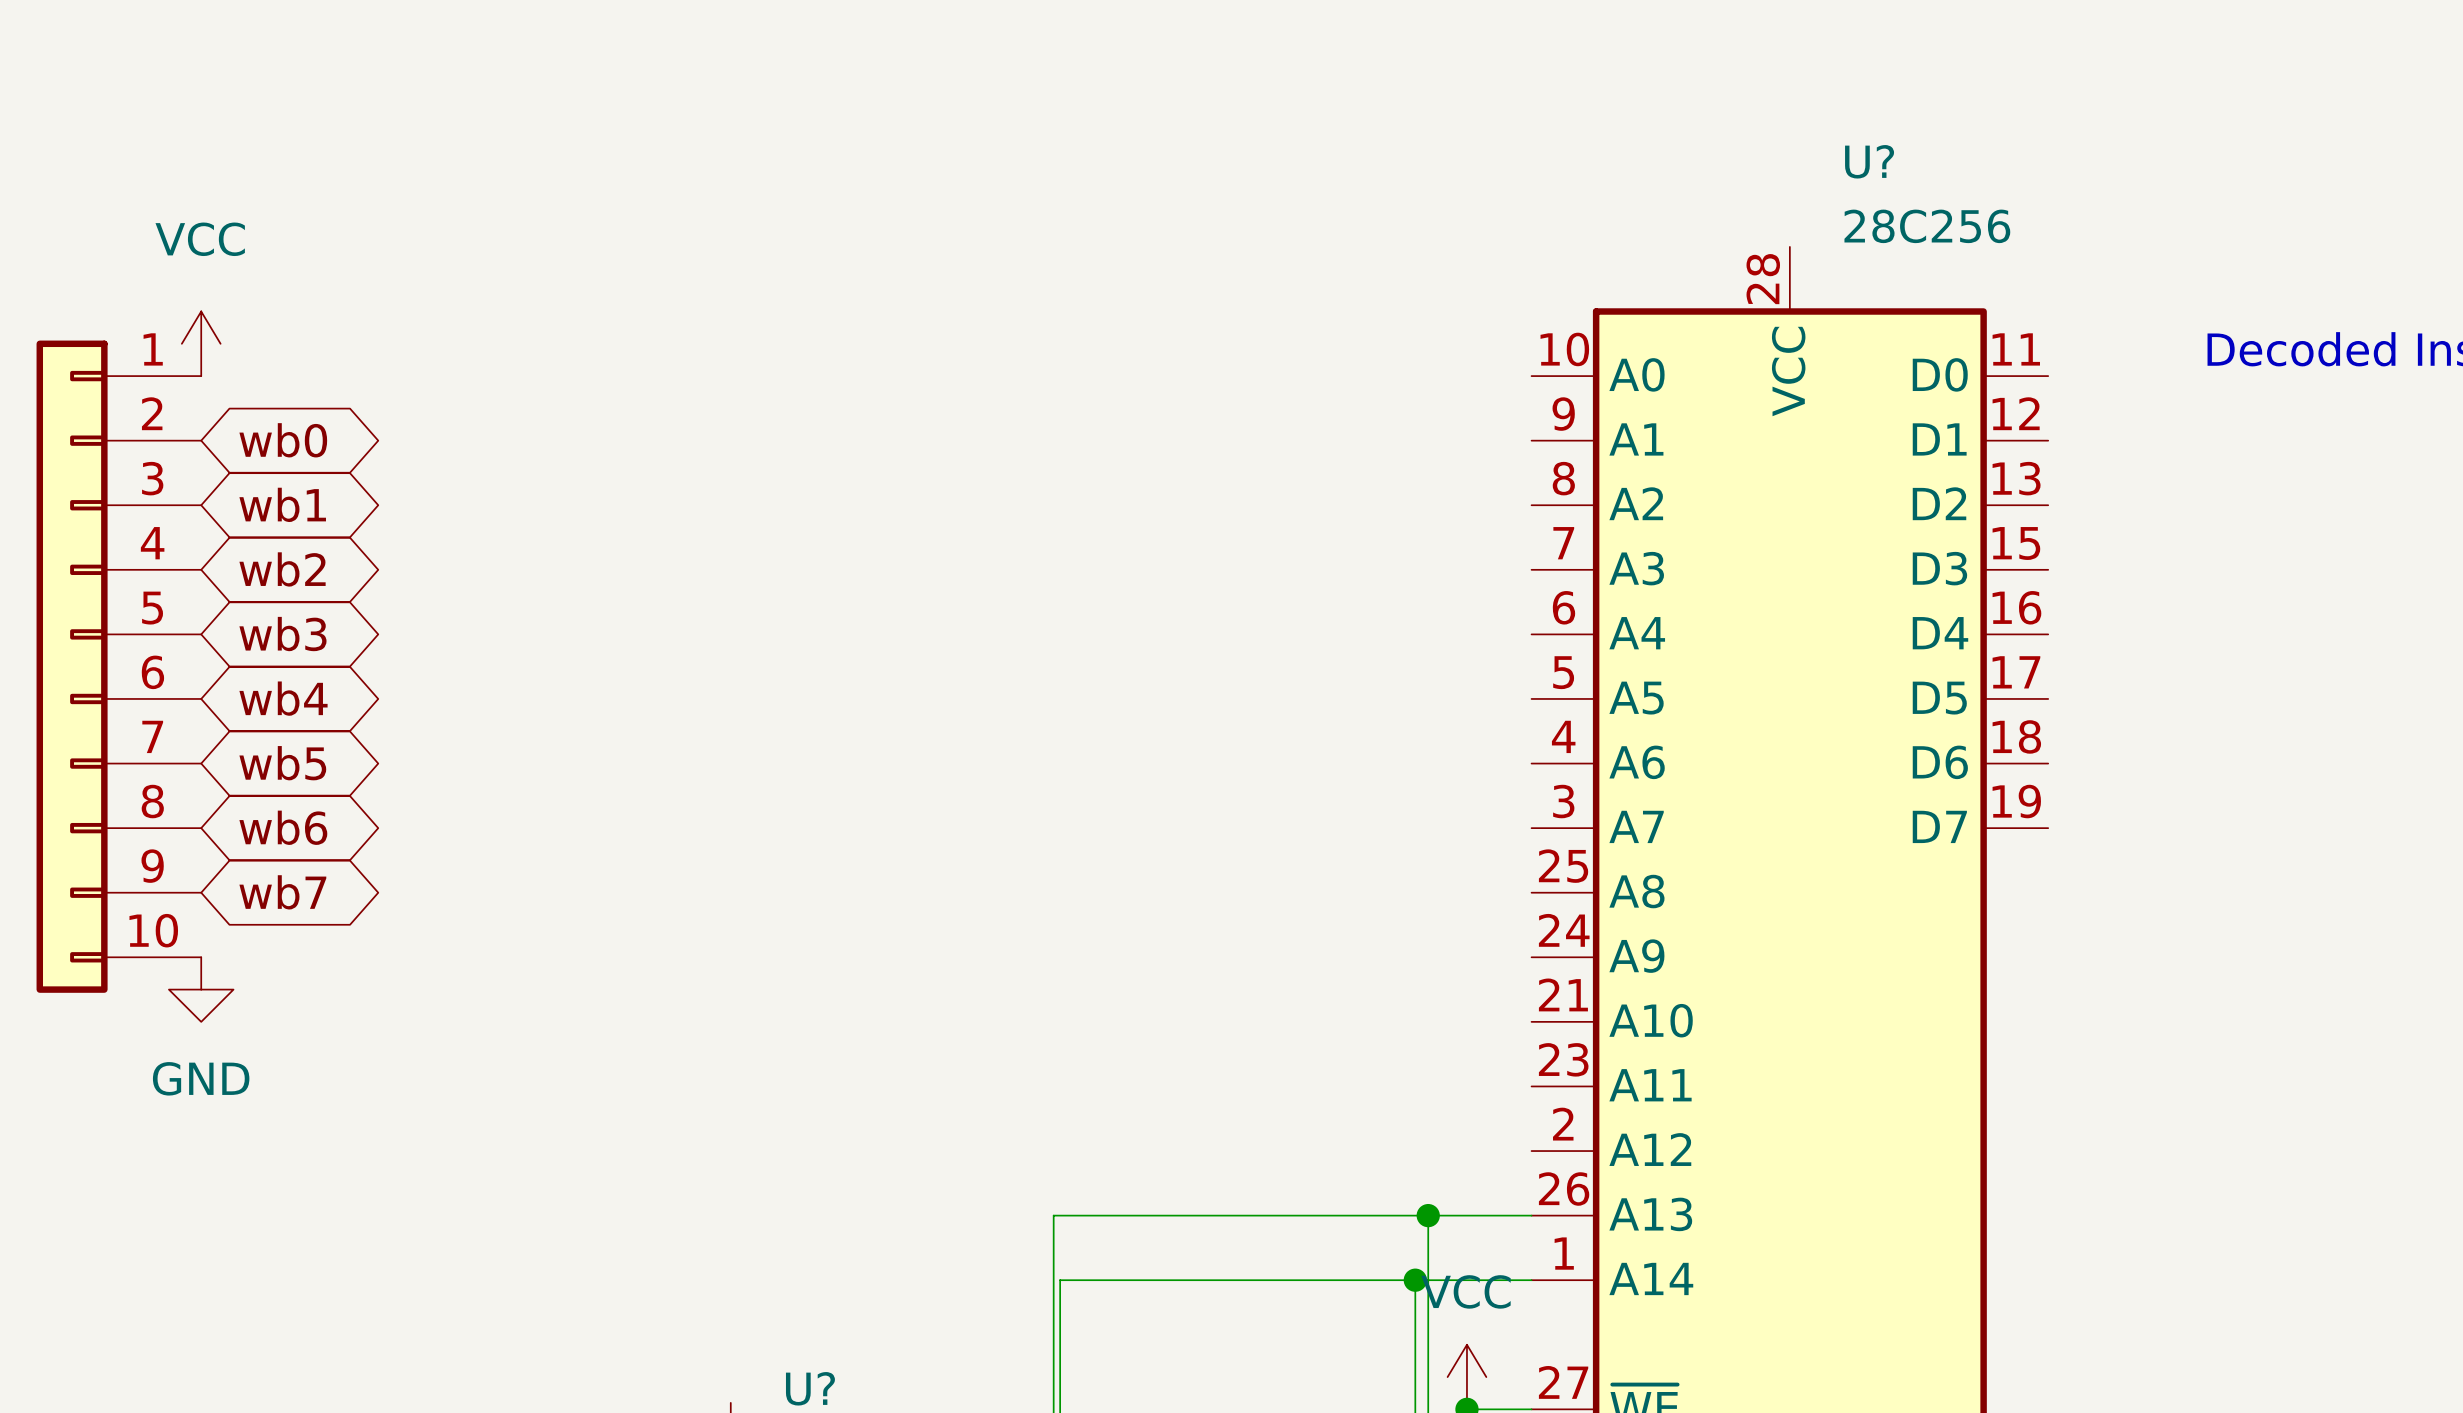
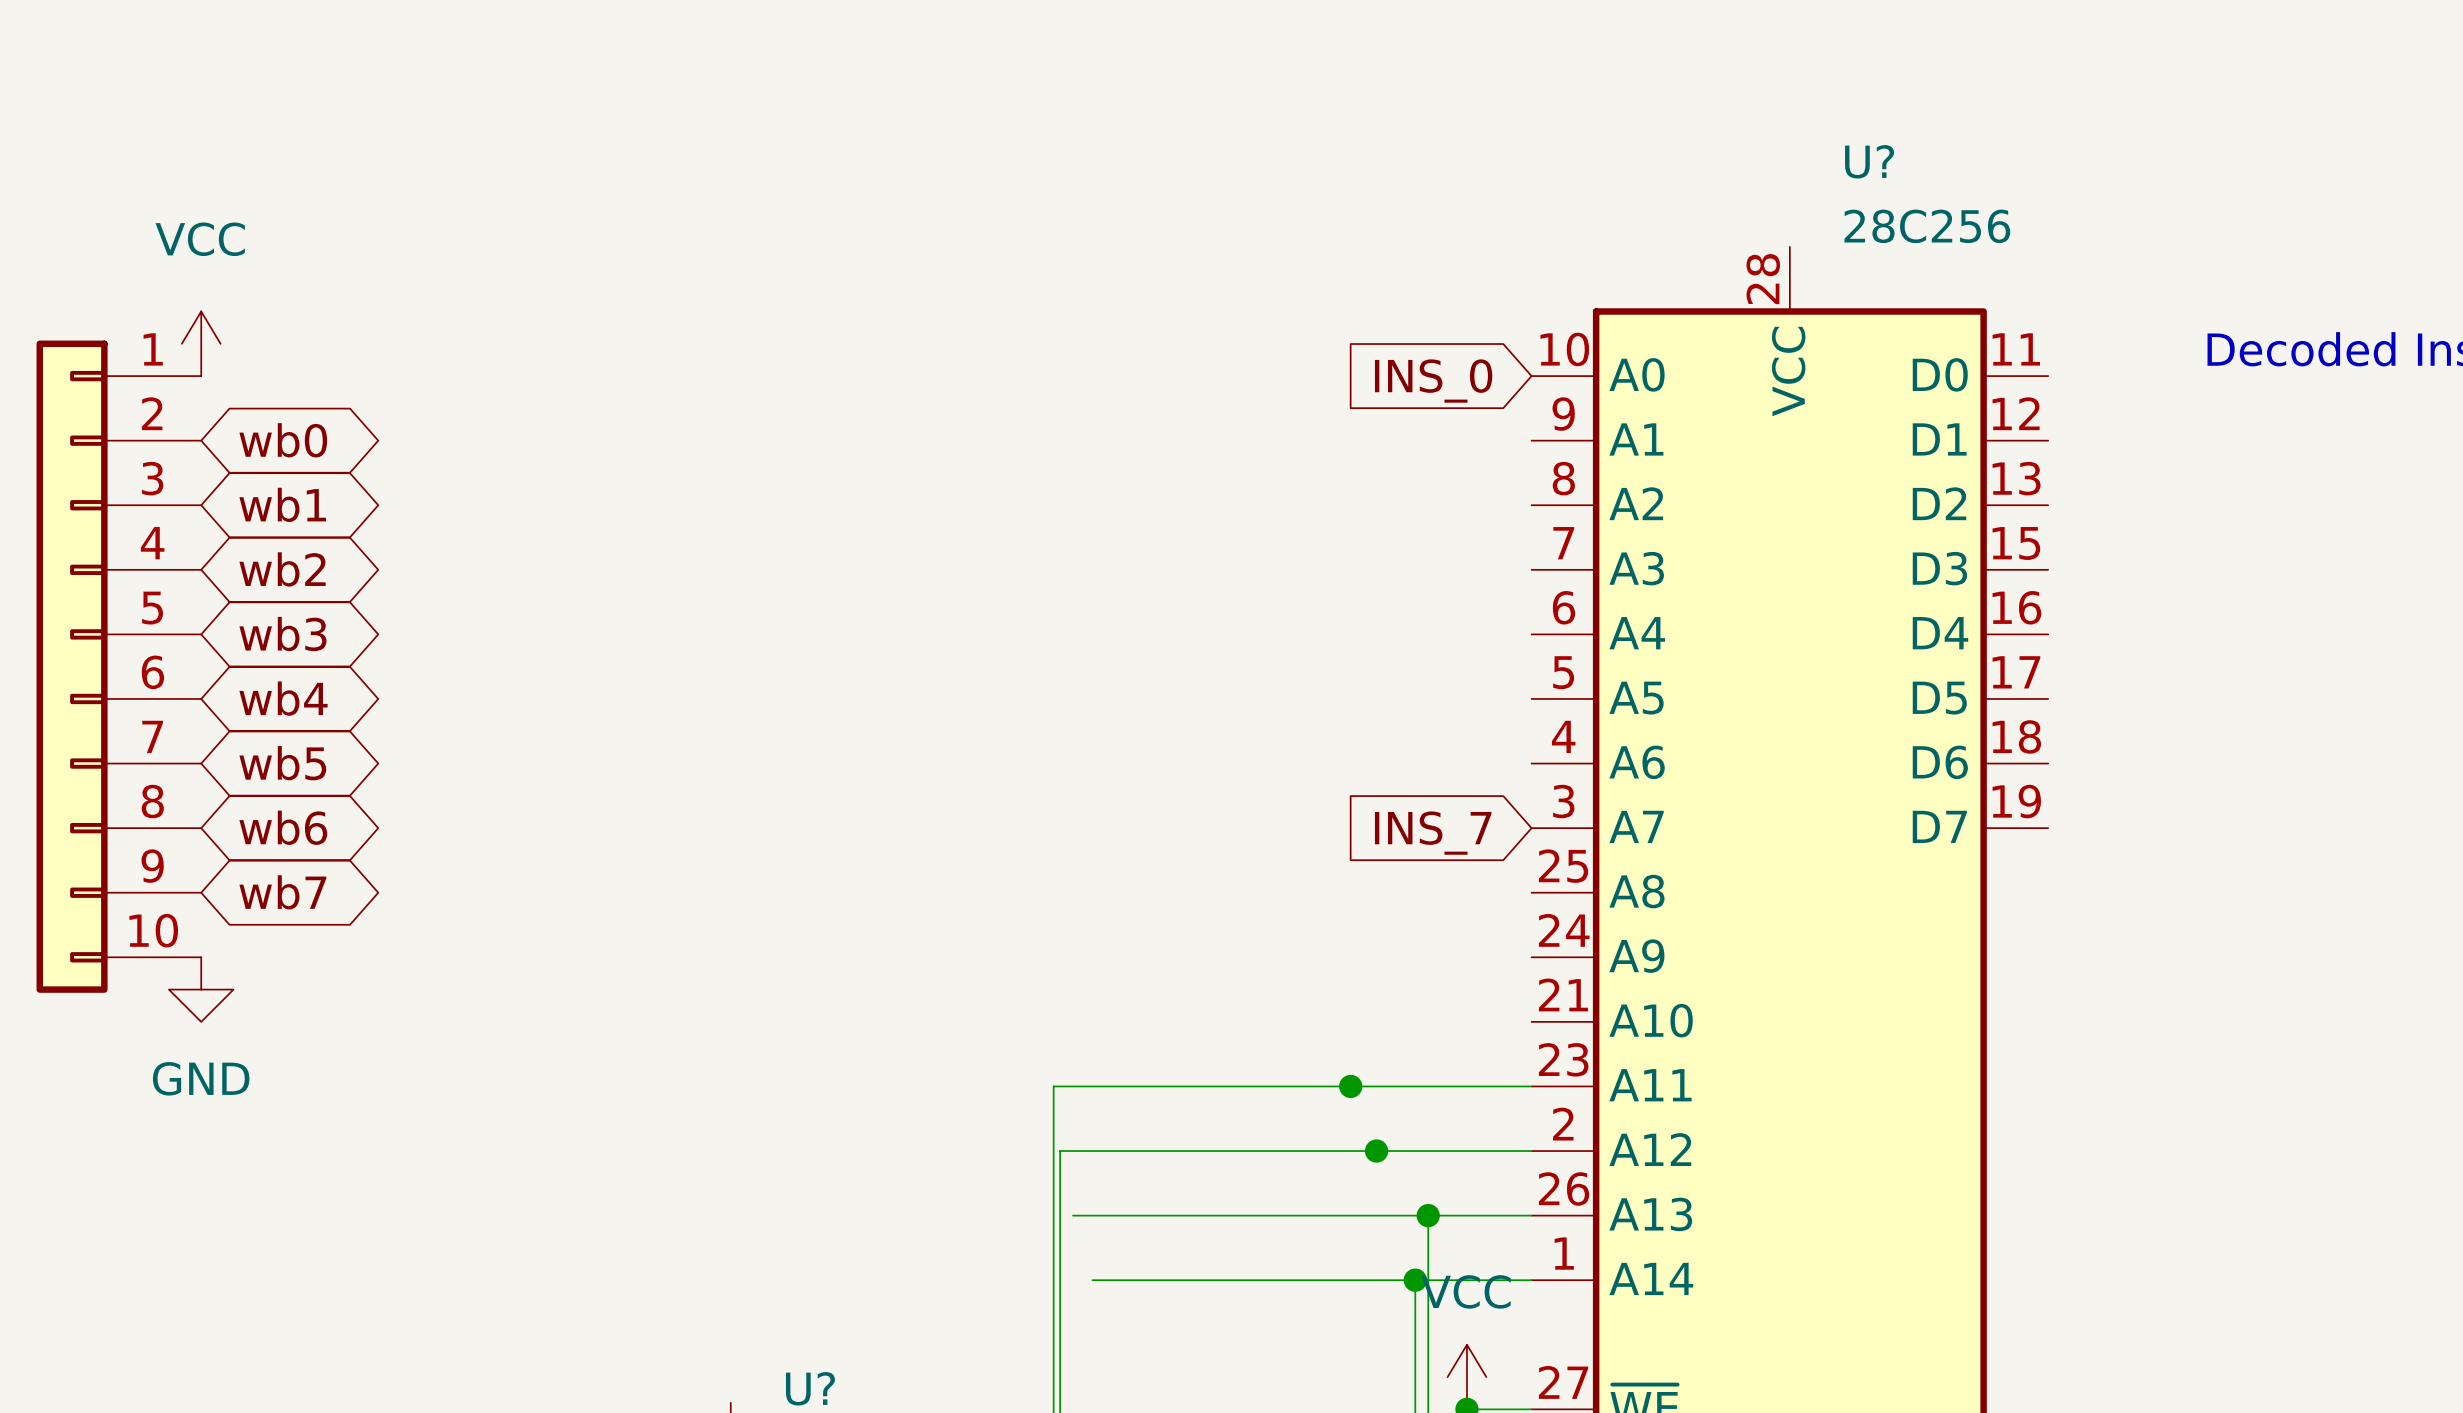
global label: none -> INS_0 (1433, 381)
global label: none -> INS_7 (1433, 833)
junction: none -> (1350, 1086)
junction: none -> (1376, 1151)
wire: (1053, 1215) (1073, 1215) -> (1053, 1215) (1053, 1086) (1531, 1086)
wire: (1060, 1280) (1092, 1280) -> (1060, 1280) (1060, 1151) (1531, 1151)

